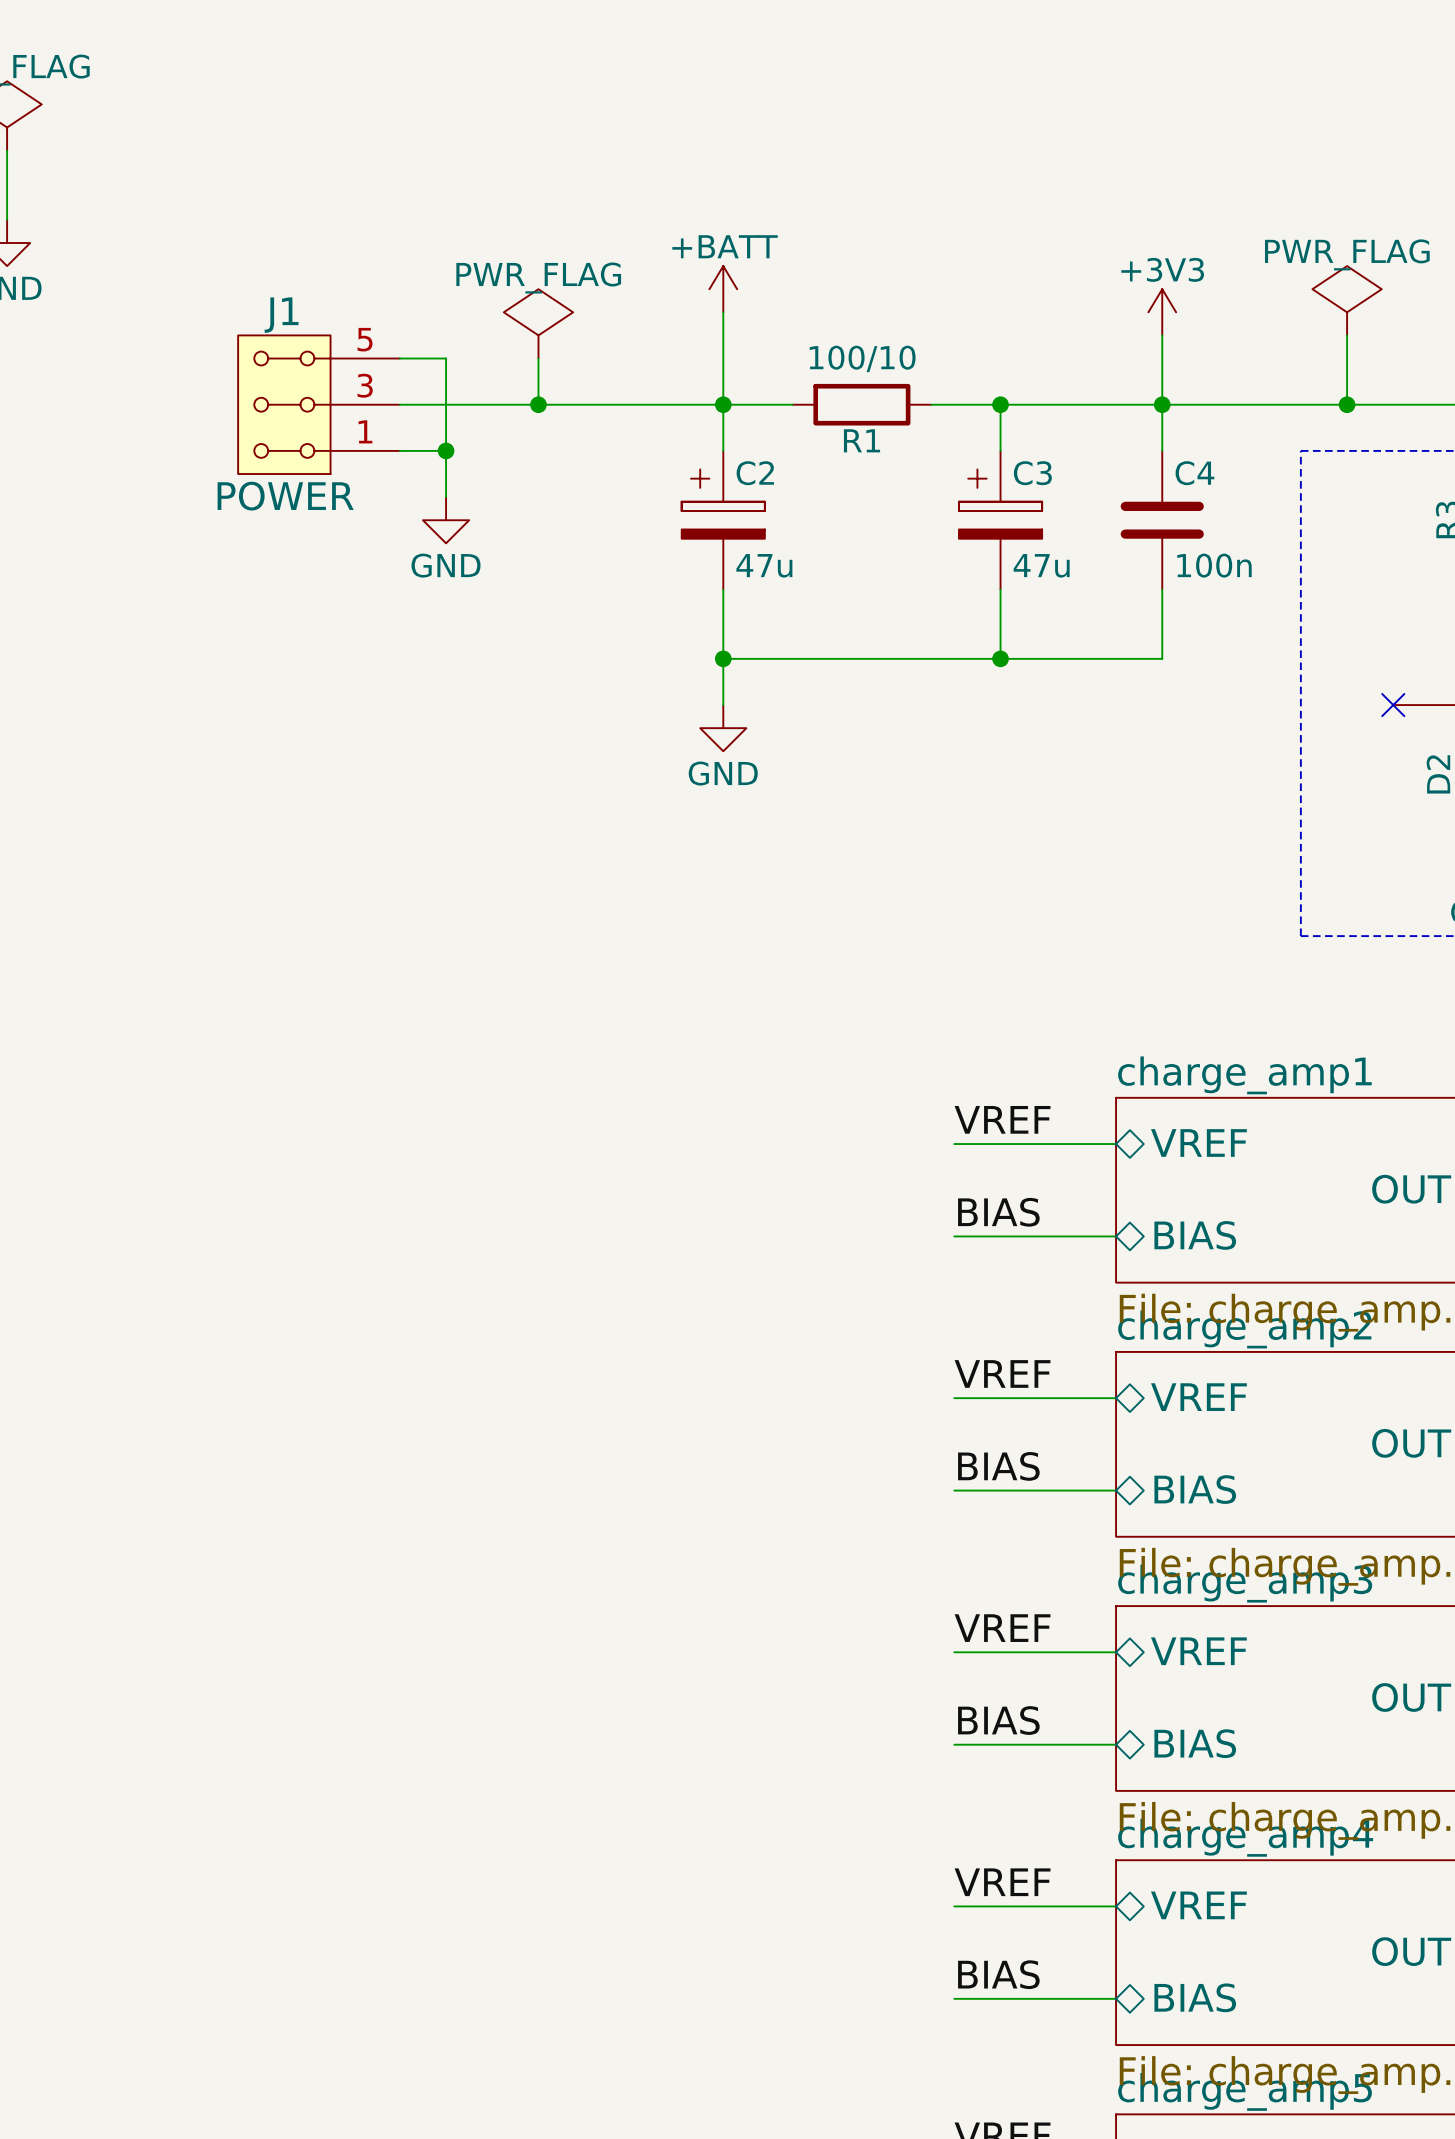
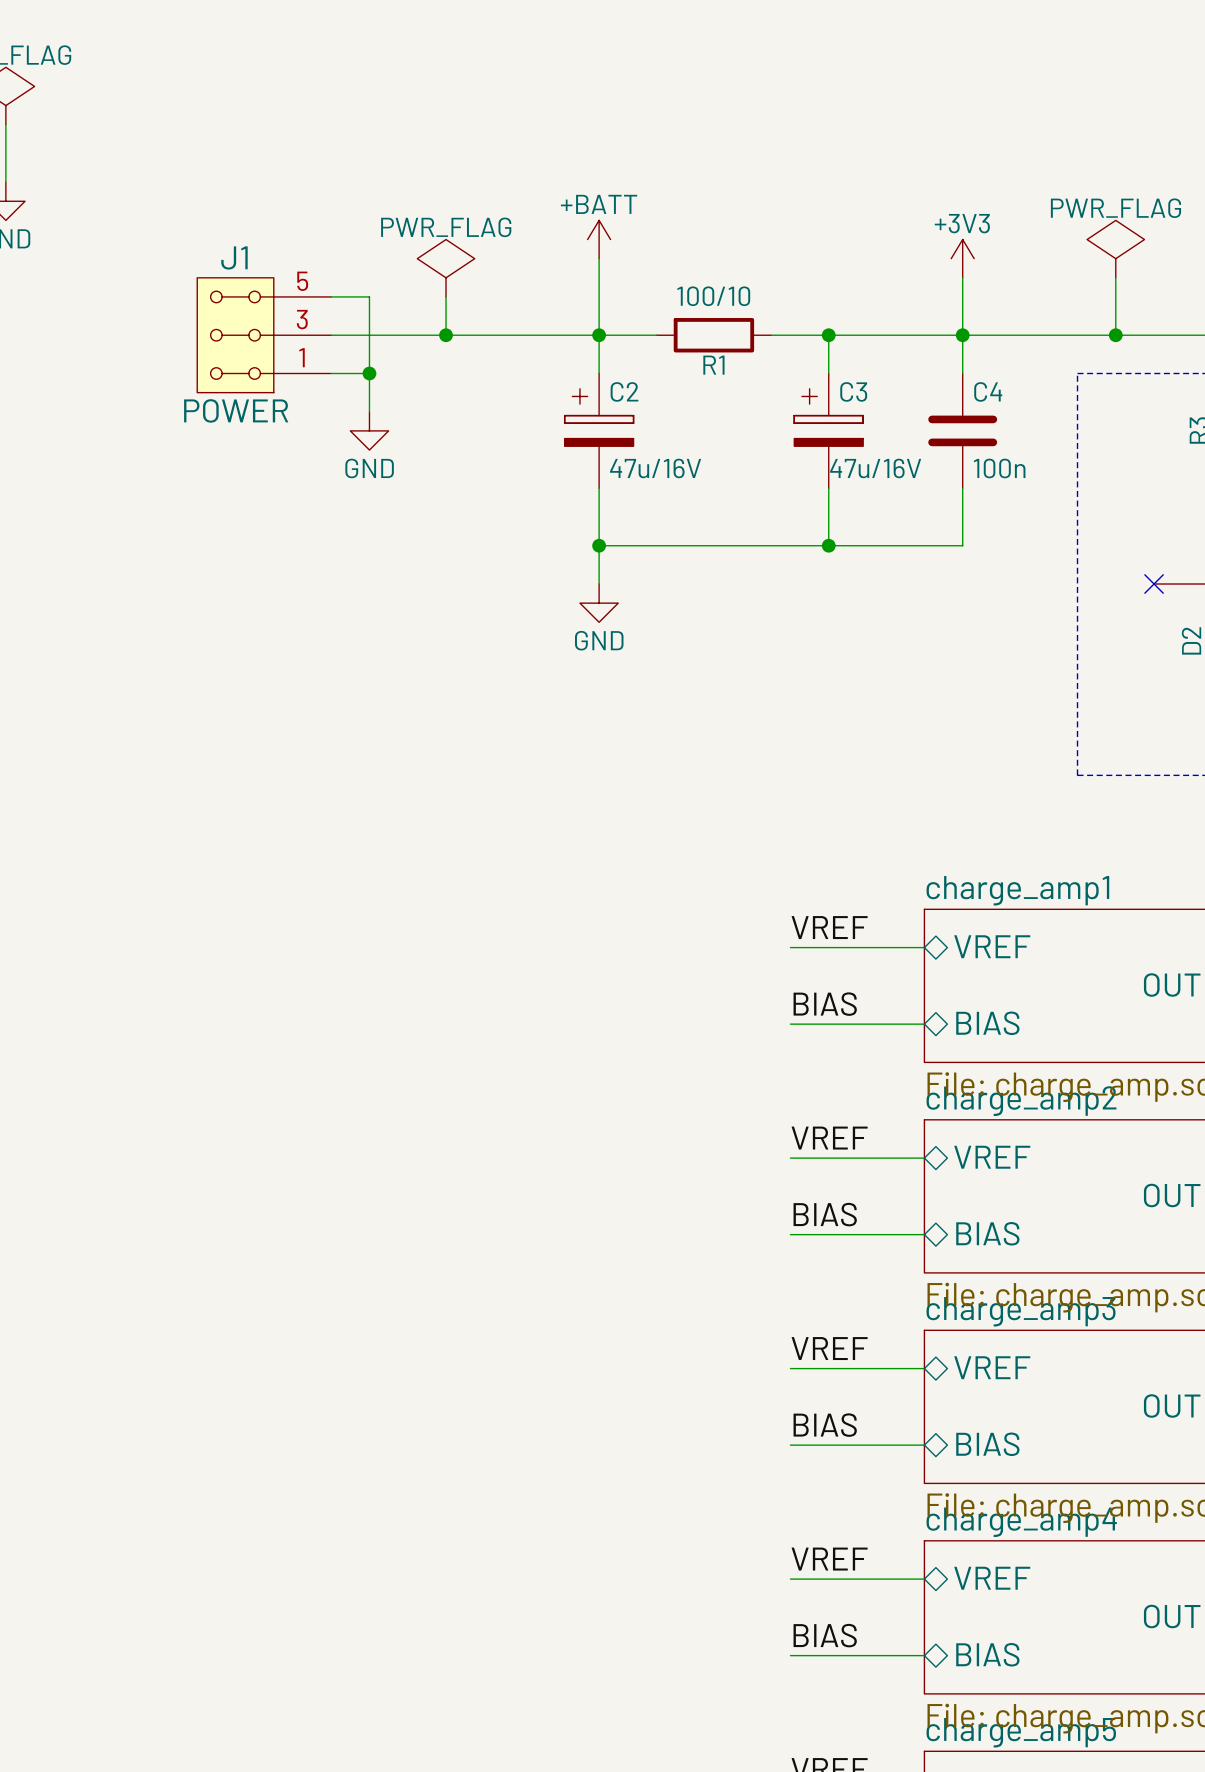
C2 value: 47u (764, 565) -> 47u/16V (655, 468)
C3 value: 47u (1041, 565) -> 47u/16V (875, 468)

